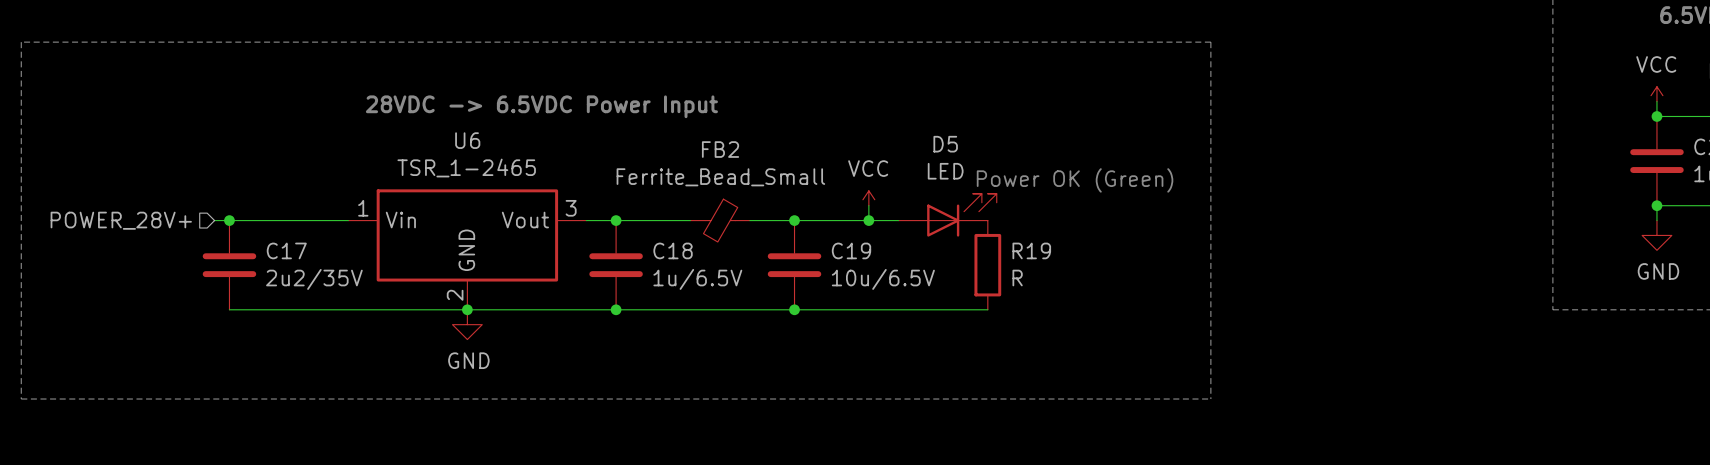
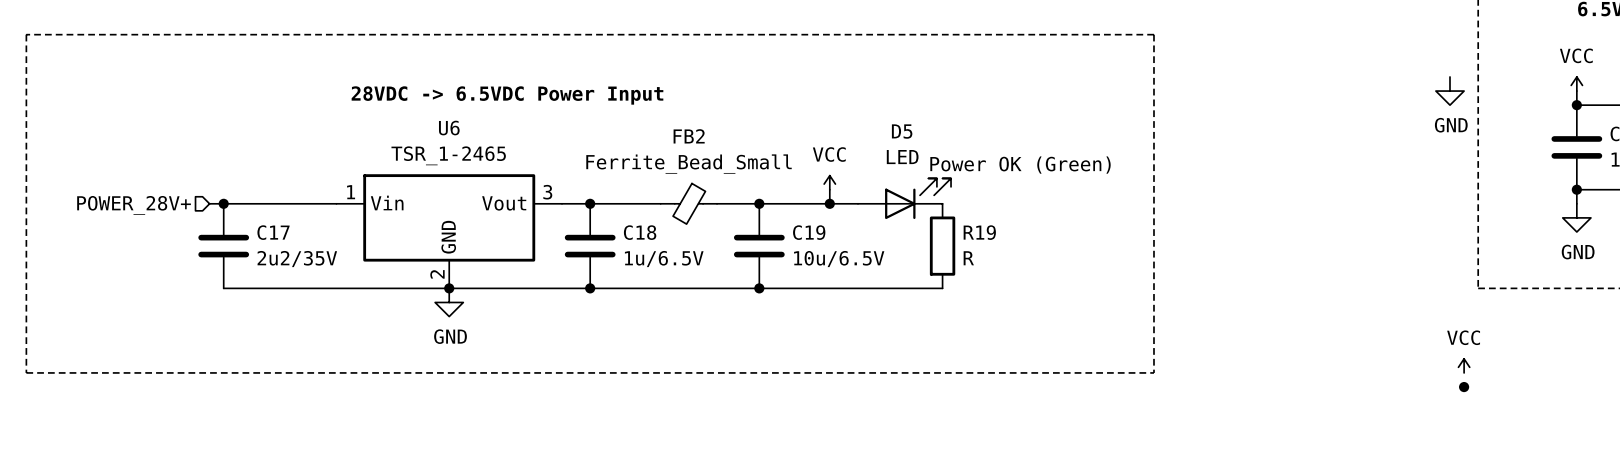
power symbol: none -> GND (1449, 91)
power symbol: none -> VCC (1464, 365)
junction: none -> (1464, 387)

